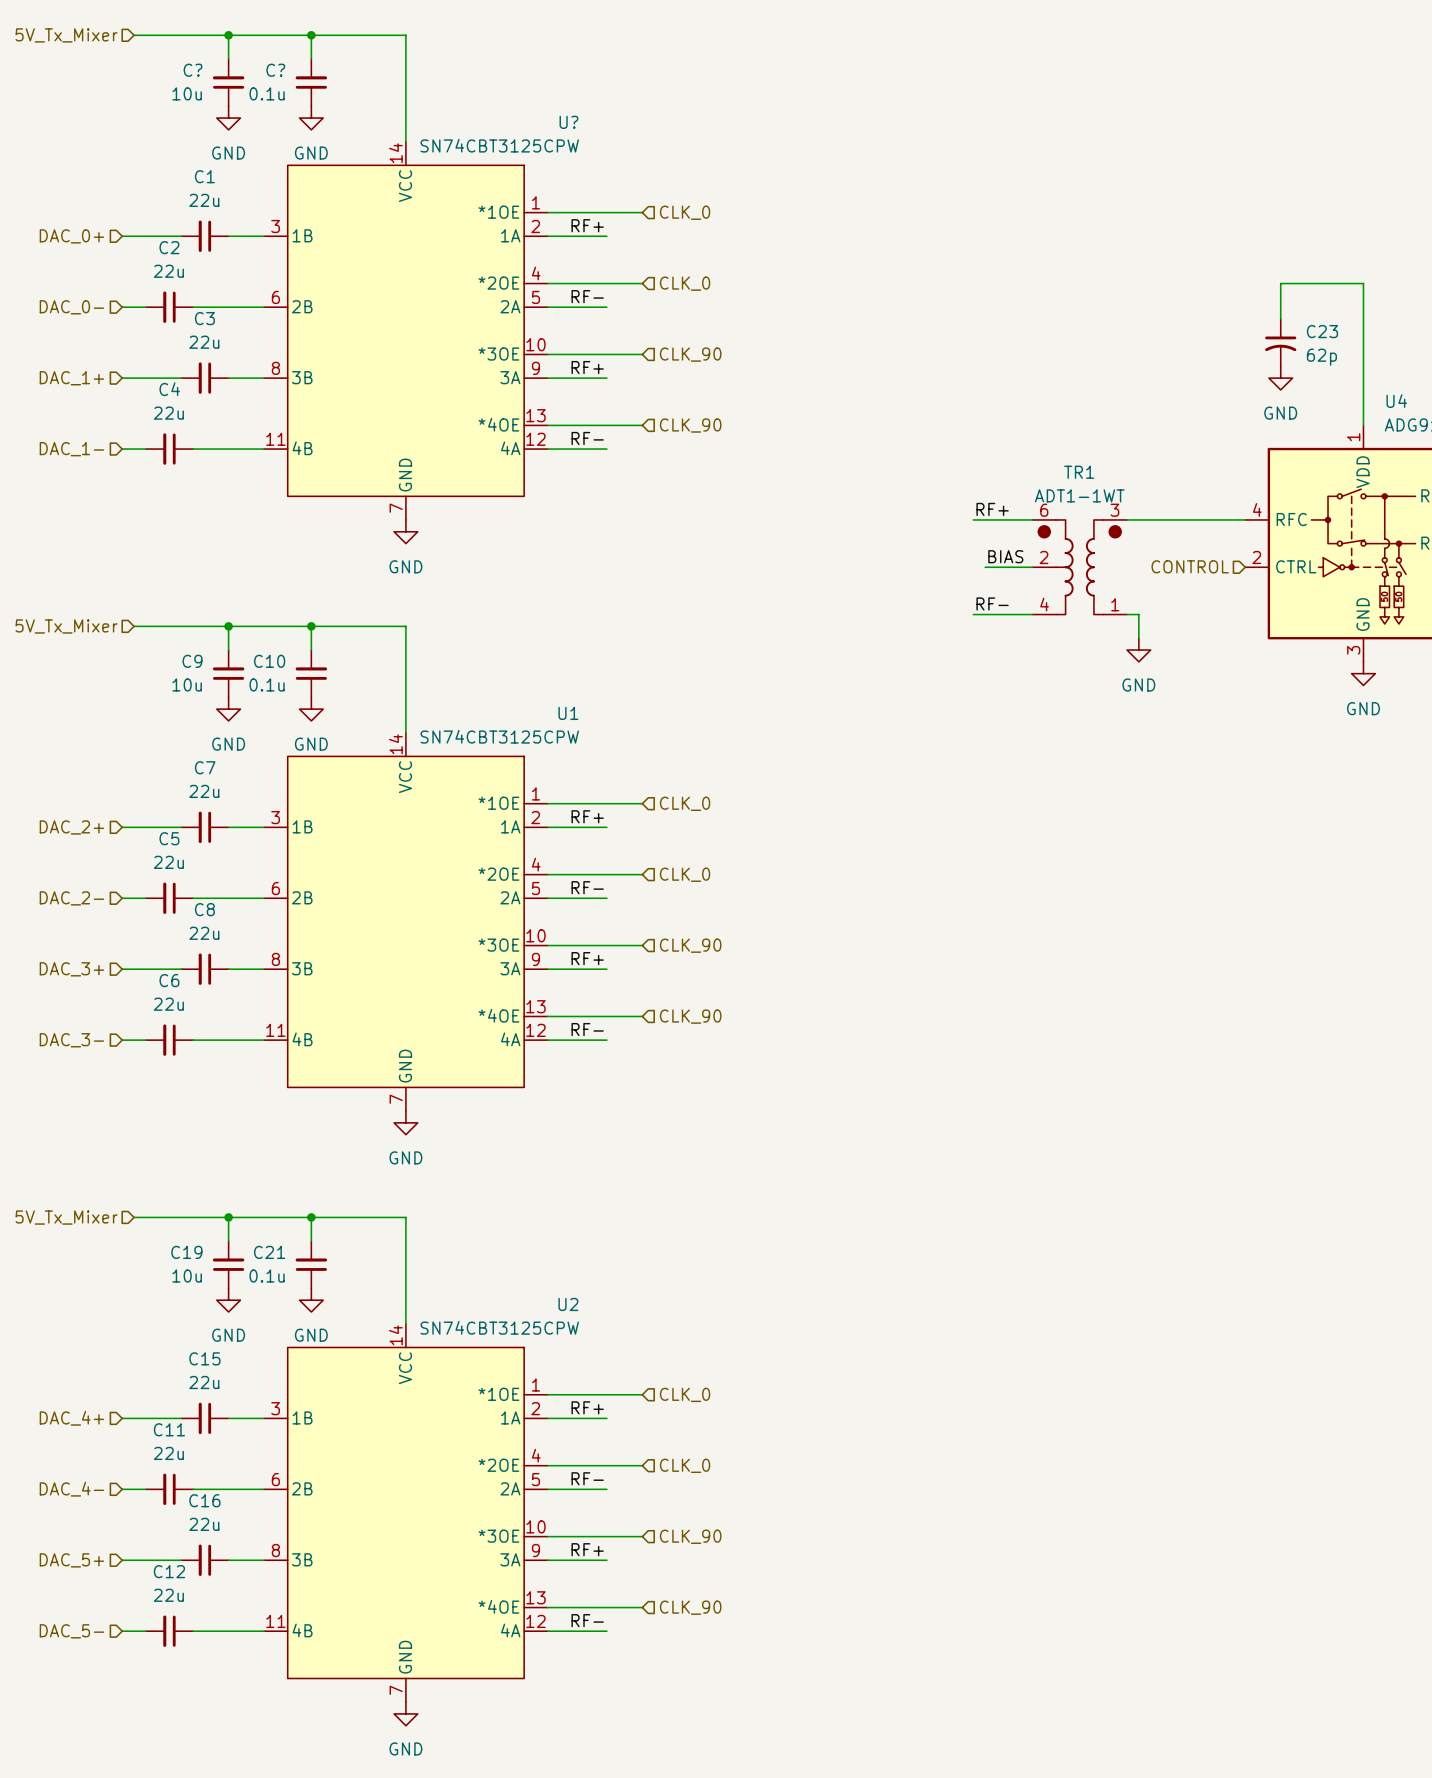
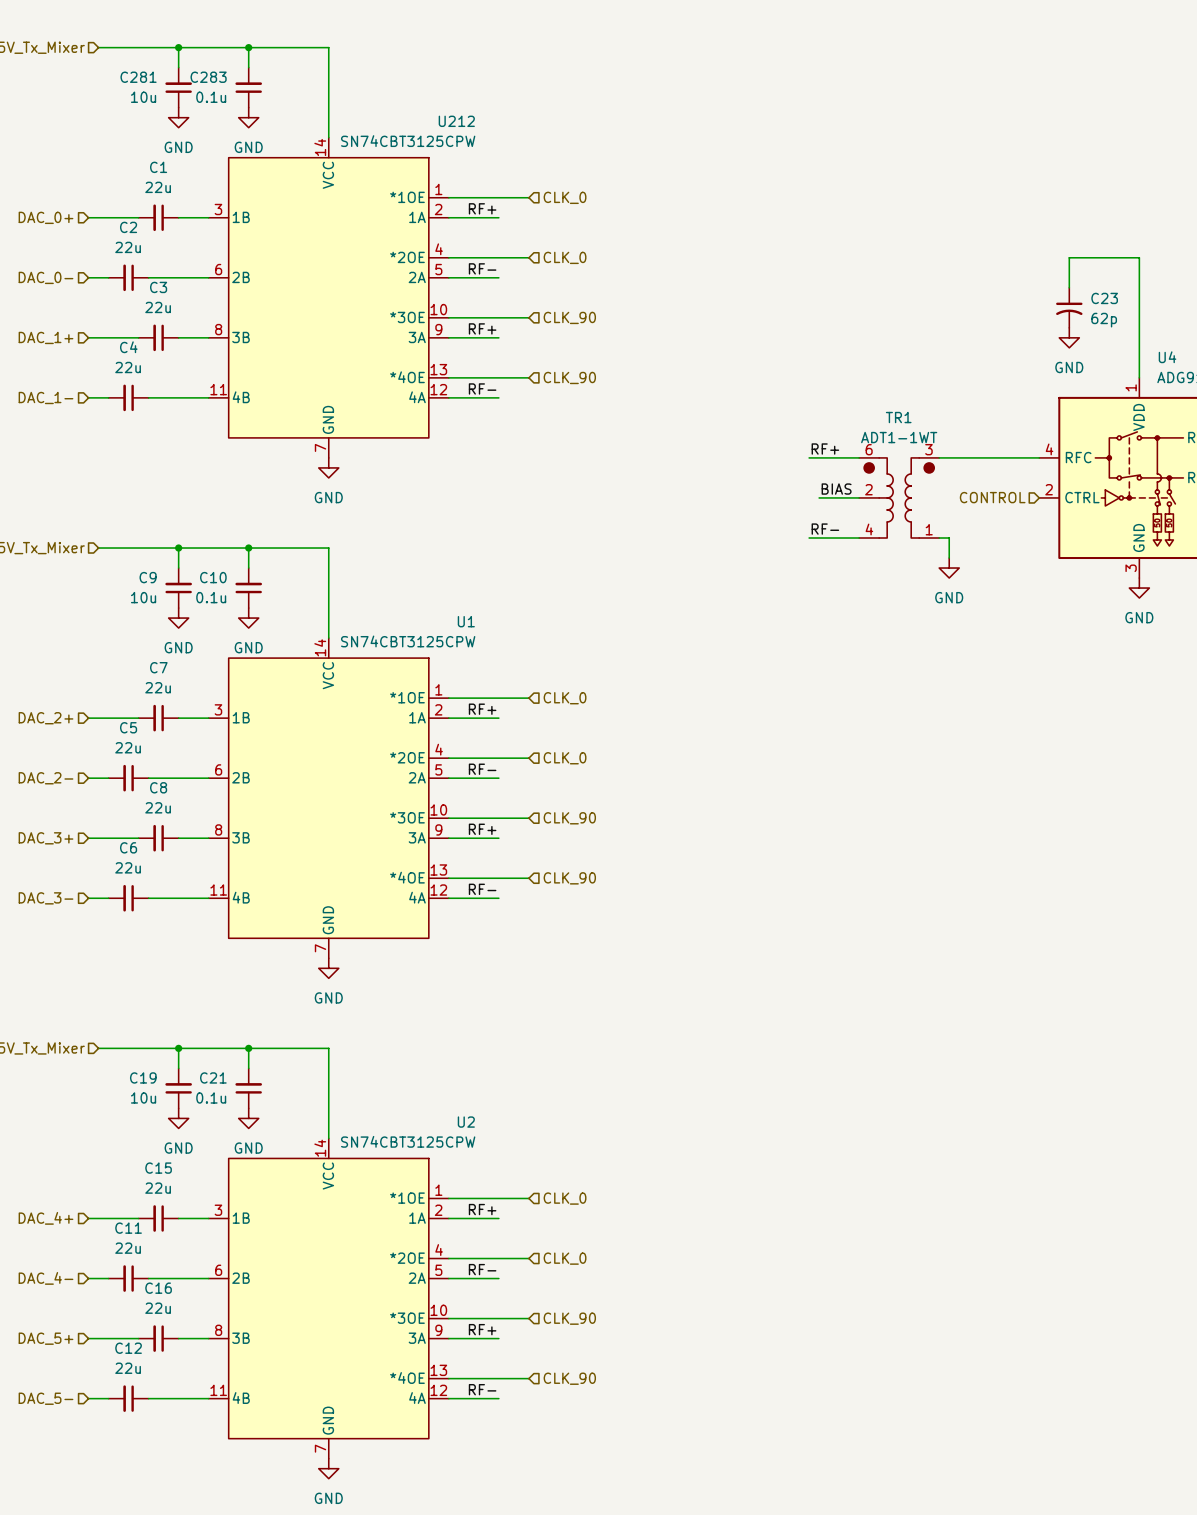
C? name: C? (193, 70) -> C281 (138, 77)
C? name: C? (275, 70) -> C283 (208, 77)
U? name: U? (568, 122) -> U212 (456, 121)

